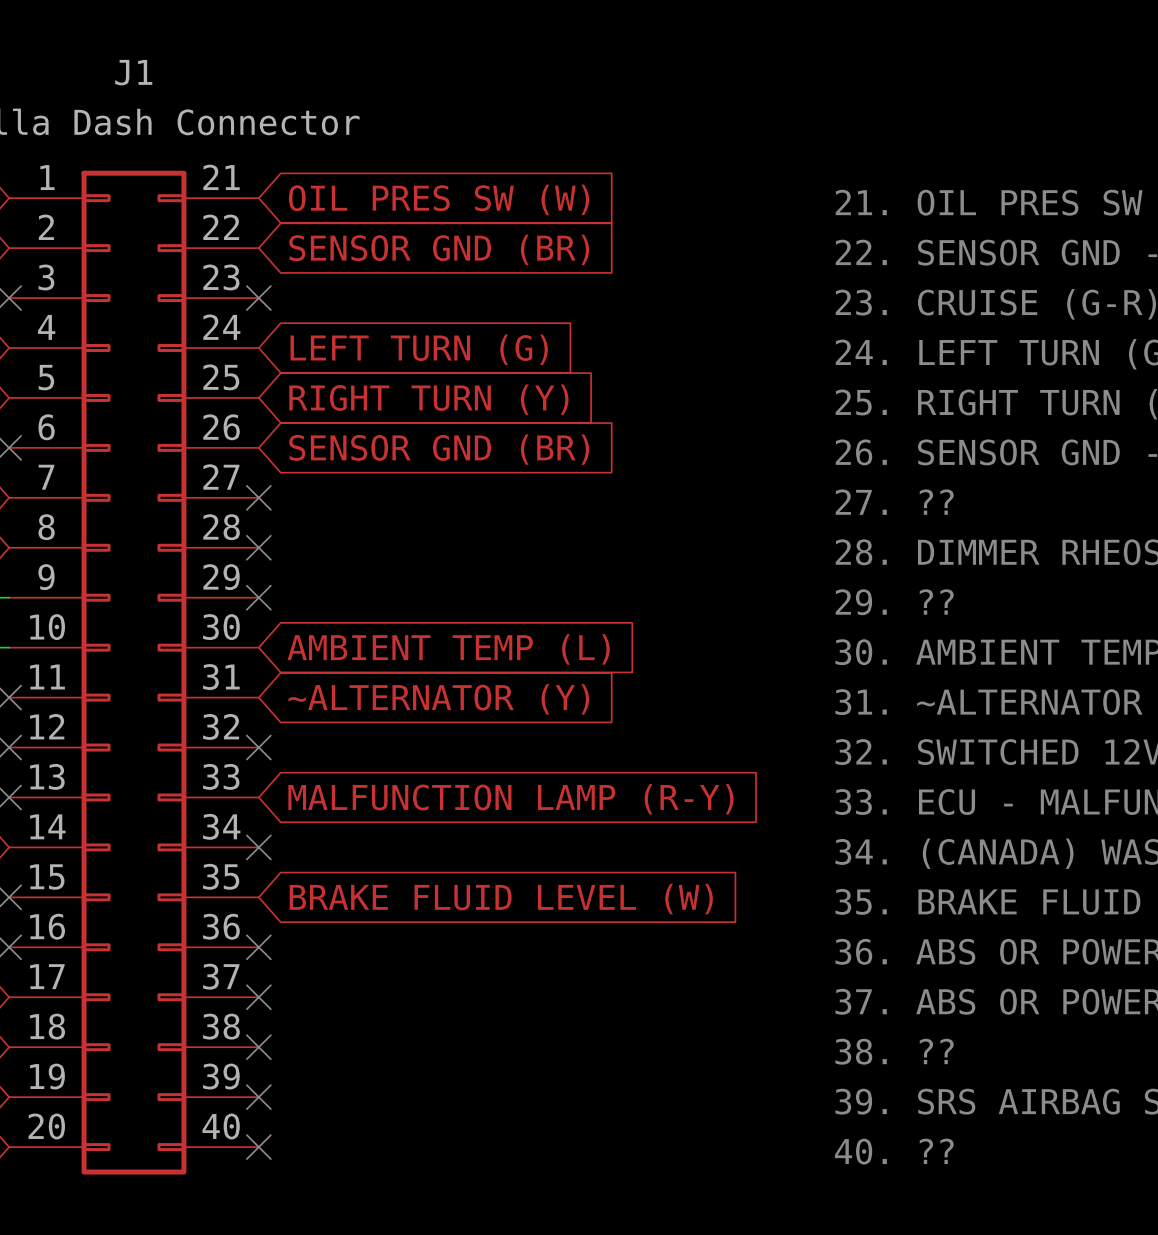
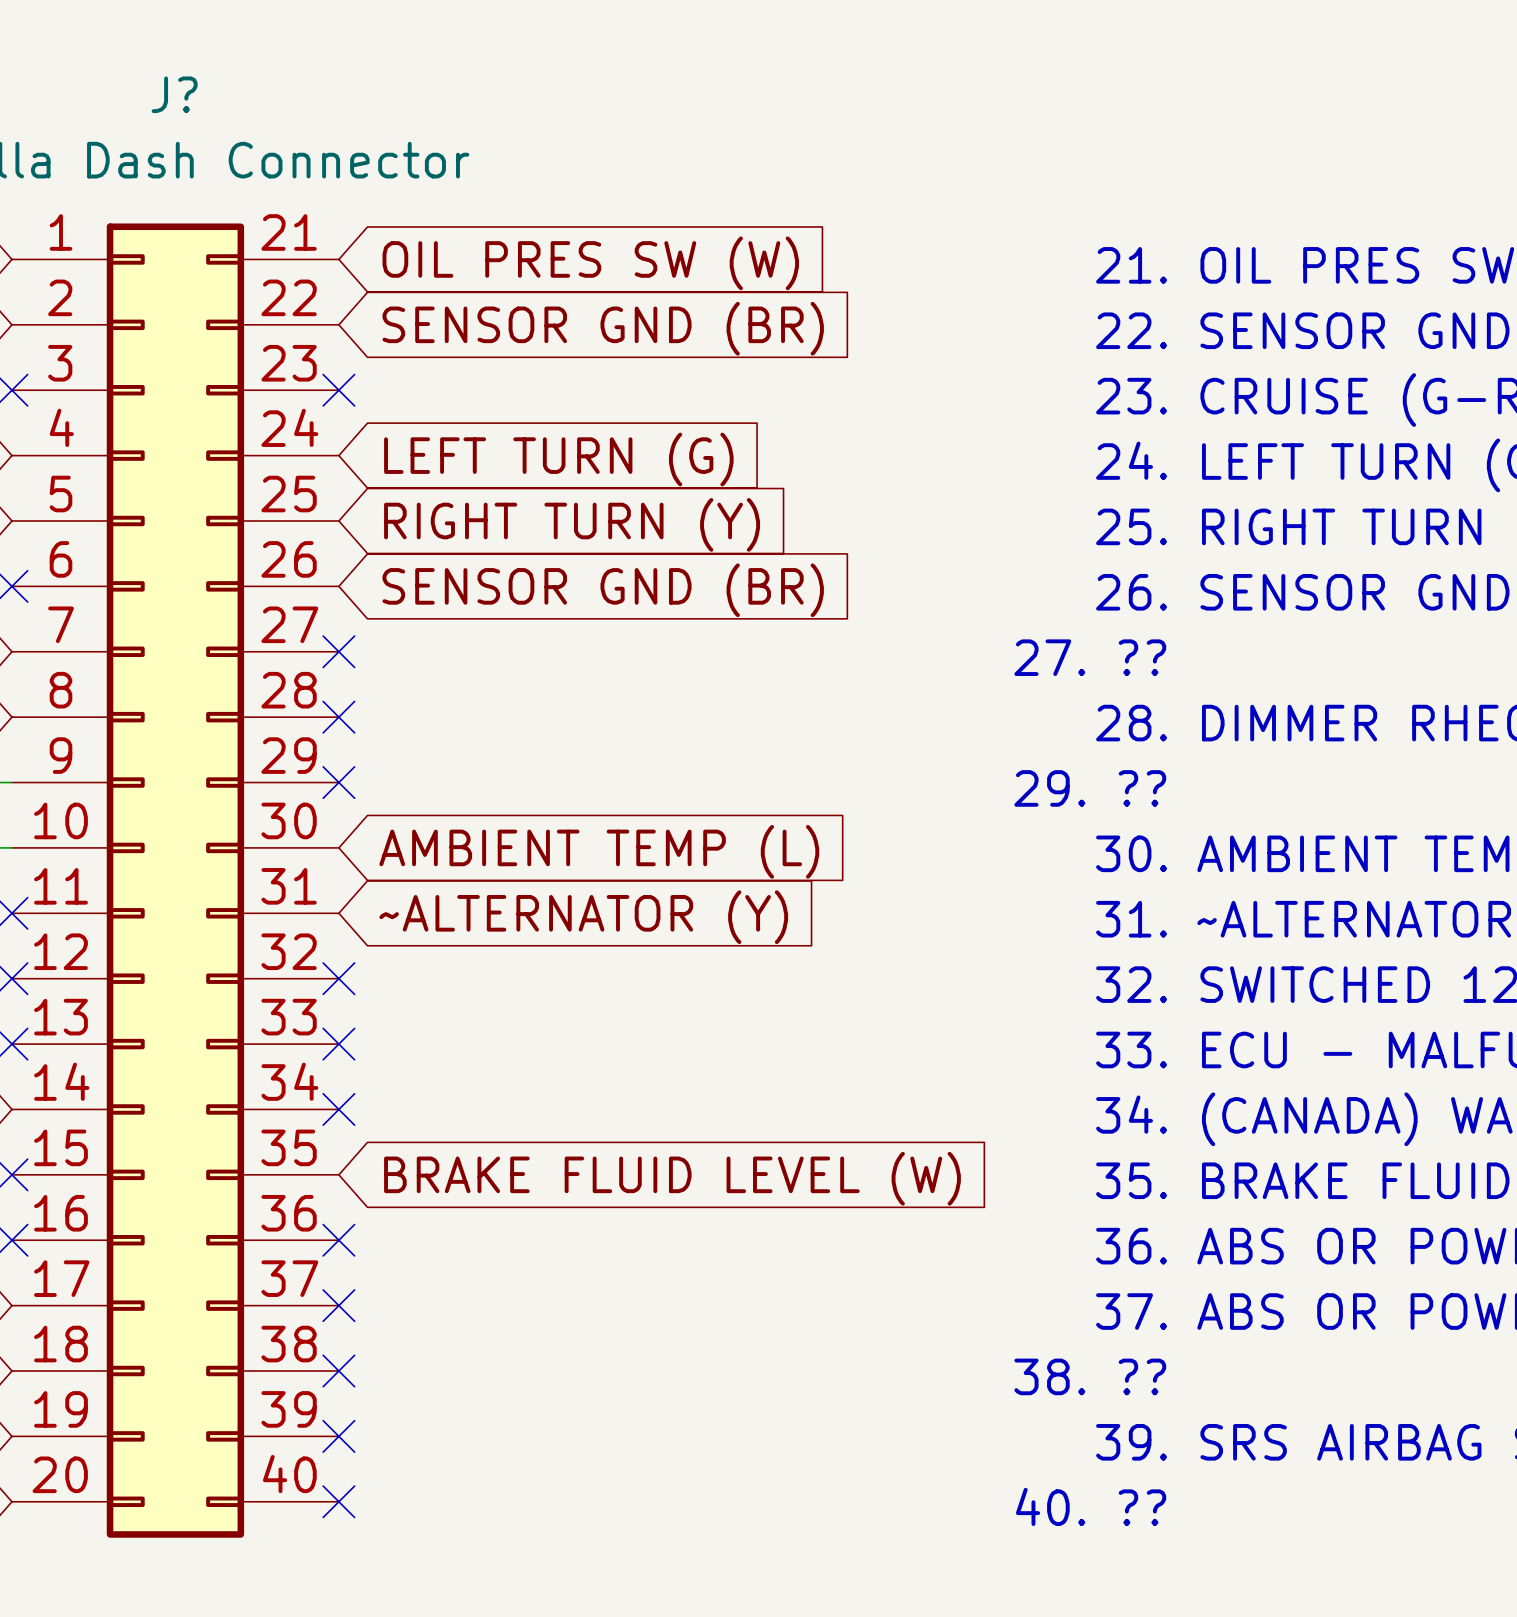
J1 name: J1 (133, 72) -> J? (174, 94)
text position: 27. ?? (894, 502) -> 27. ?? (1090, 657)
text position: 29. ?? (894, 602) -> 29. ?? (1090, 788)
no-connect mark: none -> (338, 1044)
global label: MALFUNCTION LAMP (R-Y) (510, 799) -> none
text position: 38. ?? (894, 1051) -> 38. ?? (1090, 1376)
text position: 40. ?? (894, 1151) -> 40. ?? (1091, 1506)

